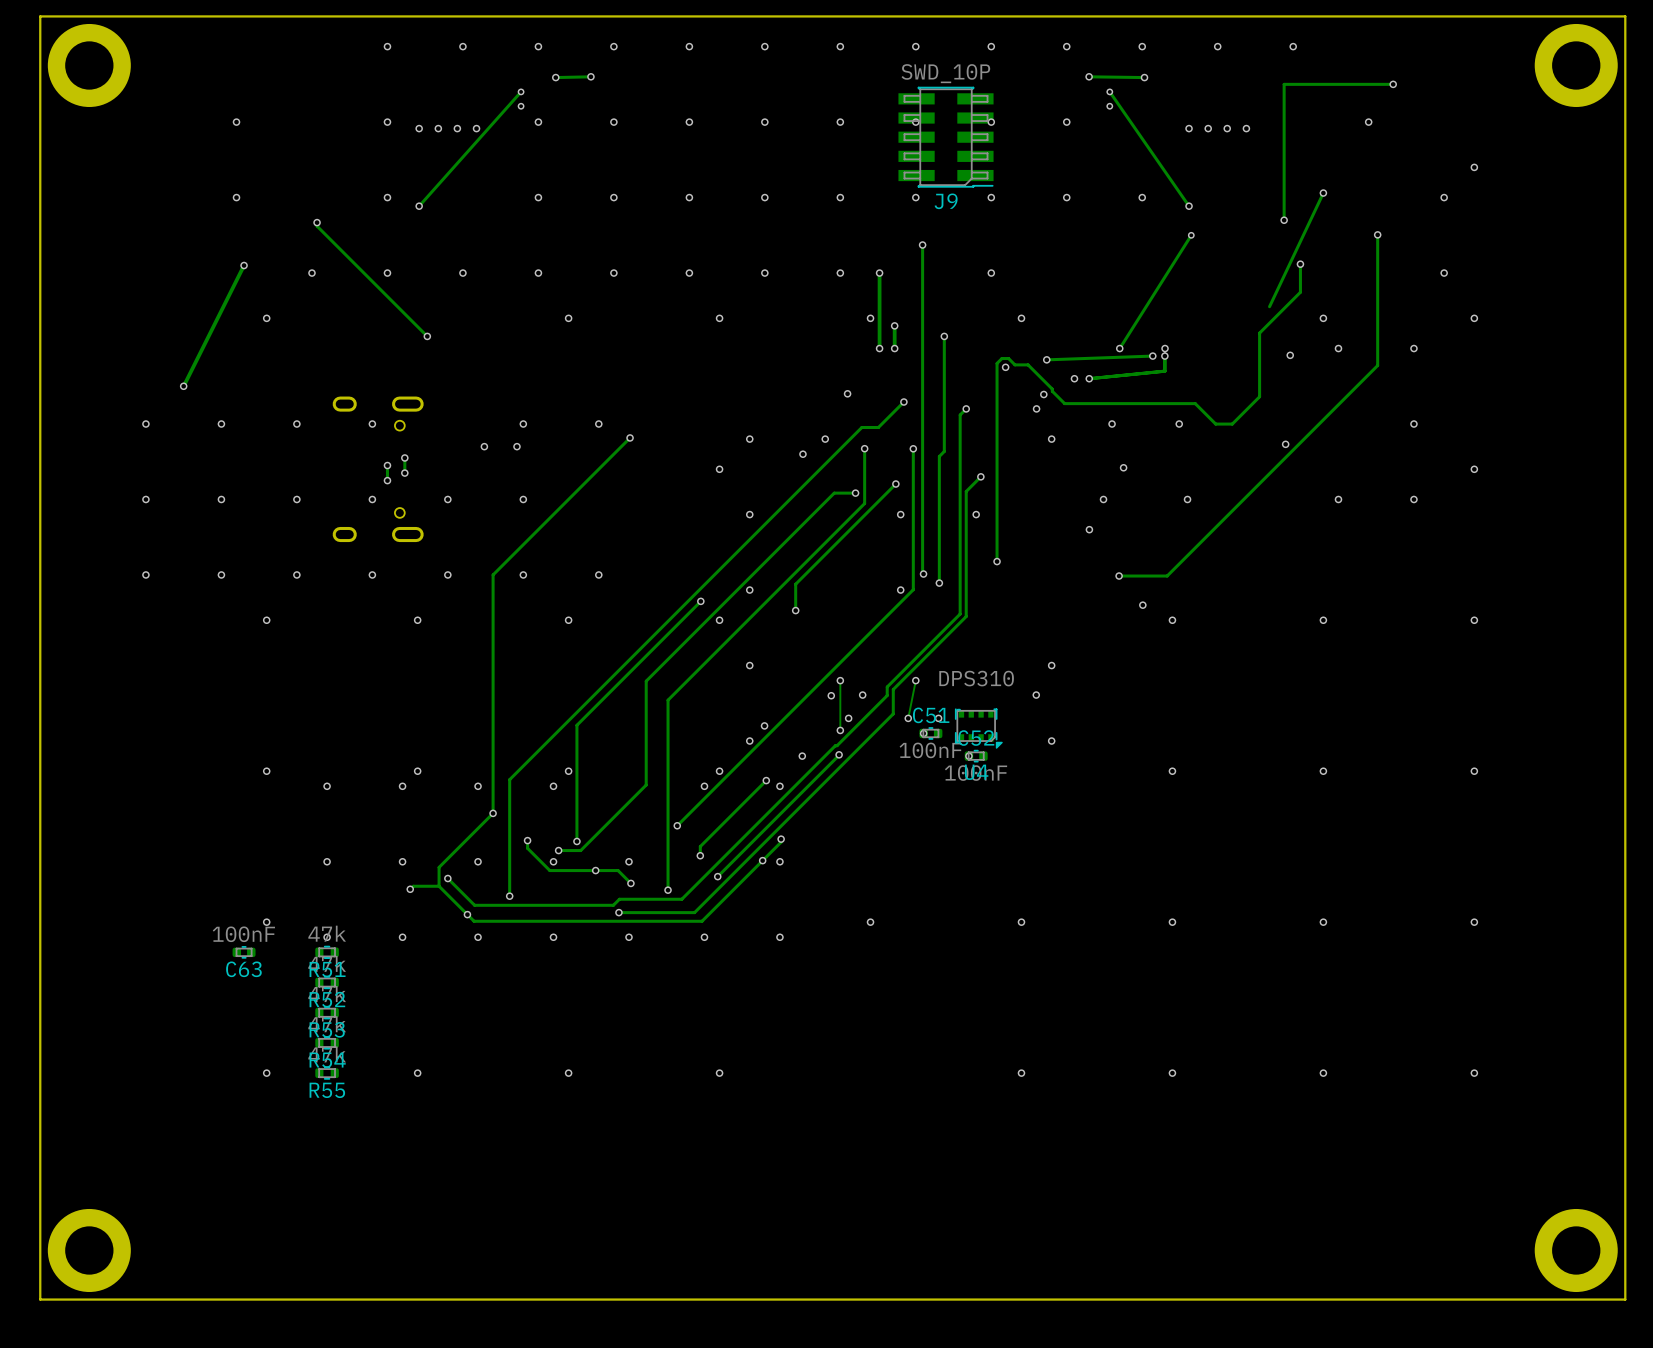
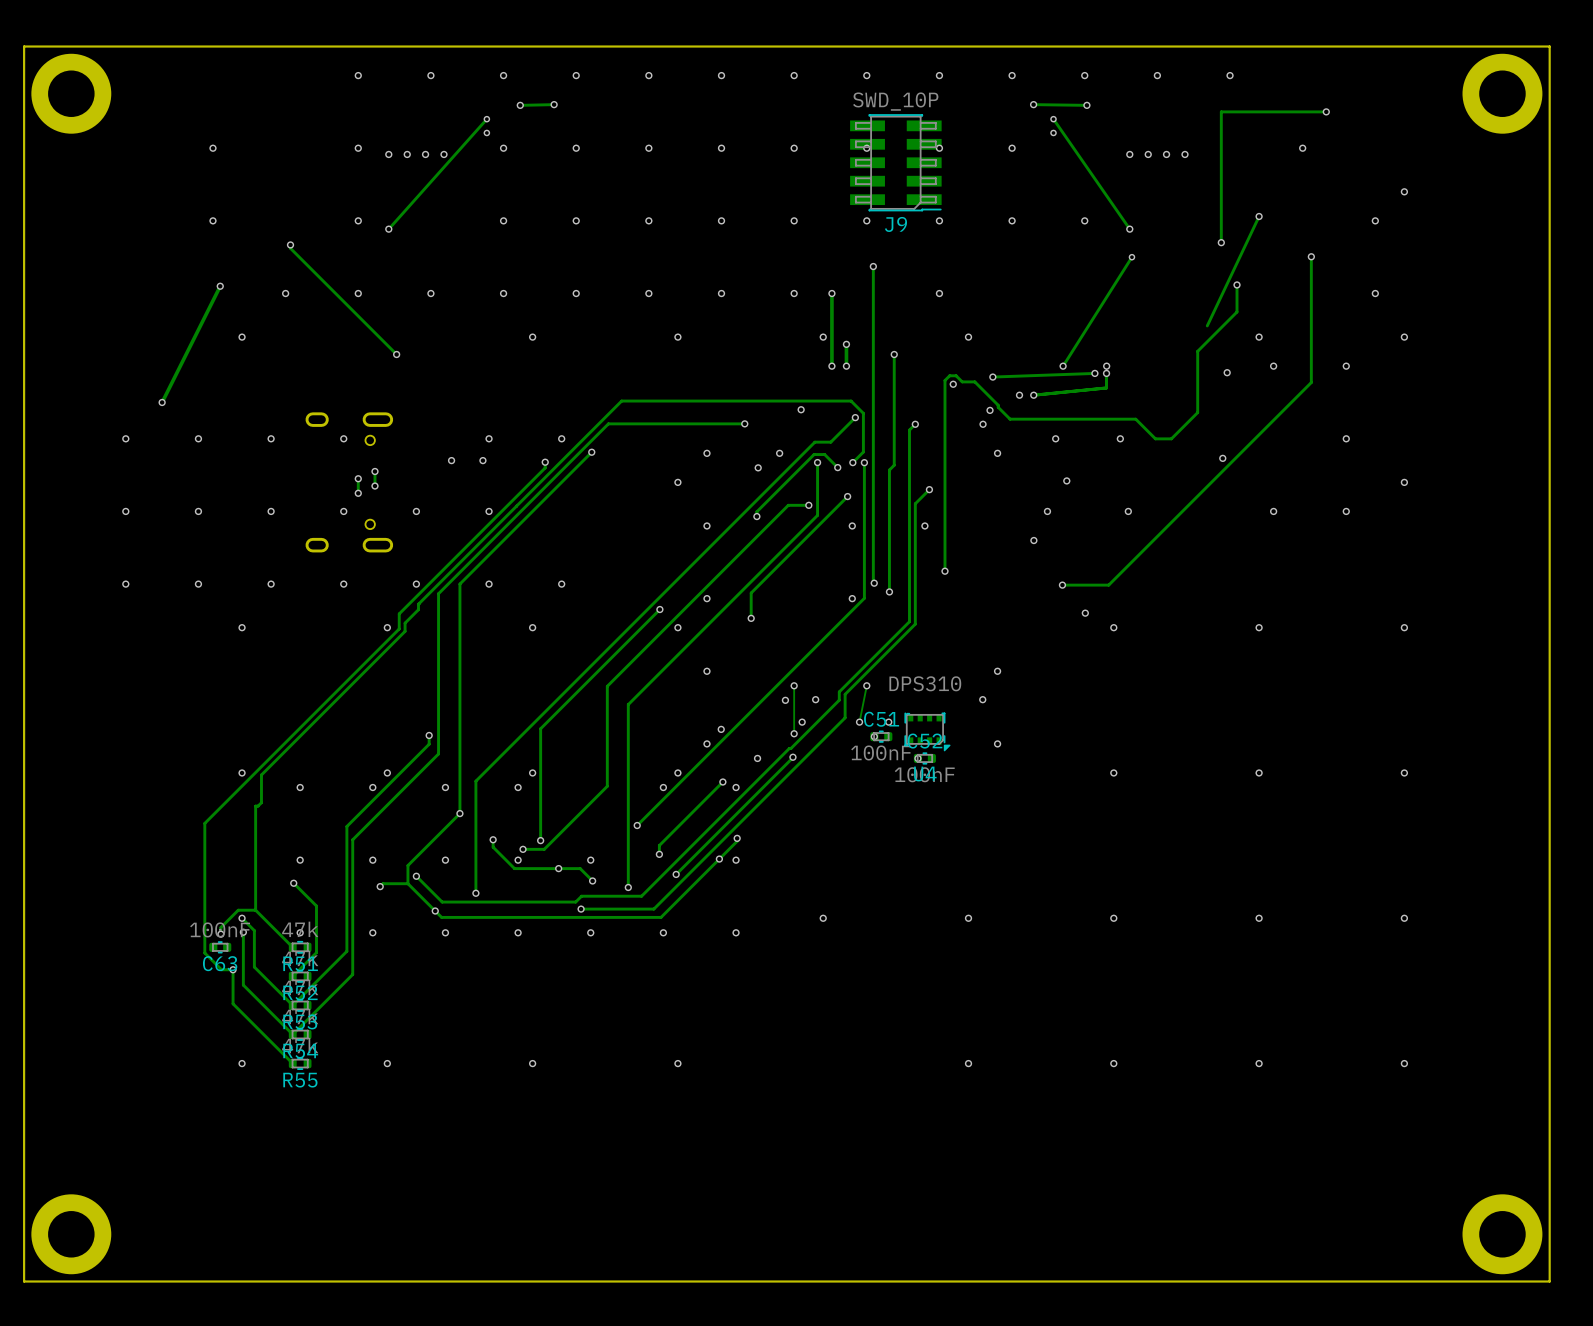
track: none -> (744, 423) (608, 423) (438, 593) (438, 753) (352, 839) (352, 974) (292, 1034) (243, 985) (243, 932)
via: none -> (744, 423)
track: none -> (545, 462) (545, 467) (399, 613) (399, 628) (204, 823) (204, 953) (221, 969) (233, 969) (233, 1003) (292, 1063)
via: none -> (545, 462)
track: none -> (852, 462) (863, 452) (863, 413) (851, 401) (621, 401) (418, 604) (418, 609) (405, 623) (405, 631) (261, 774) (261, 802) (255, 806) (255, 910)
via: none -> (852, 462)
track: none -> (837, 467) (824, 454) (814, 454) (756, 511) (756, 516)
via: none -> (837, 467)
via: none -> (756, 516)
track: none -> (429, 735) (429, 744) (346, 826) (346, 951) (292, 1005) (254, 967) (254, 930) (242, 918)
via: none -> (429, 735)
track: none -> (293, 883) (316, 906) (316, 952) (292, 976)
via: none -> (293, 883)
track: none -> (255, 910) (292, 947)
track: none -> (255, 910) (238, 910) (220, 927) (220, 934)
via: none -> (243, 932)
via: none -> (220, 934)
via: none -> (233, 969)

